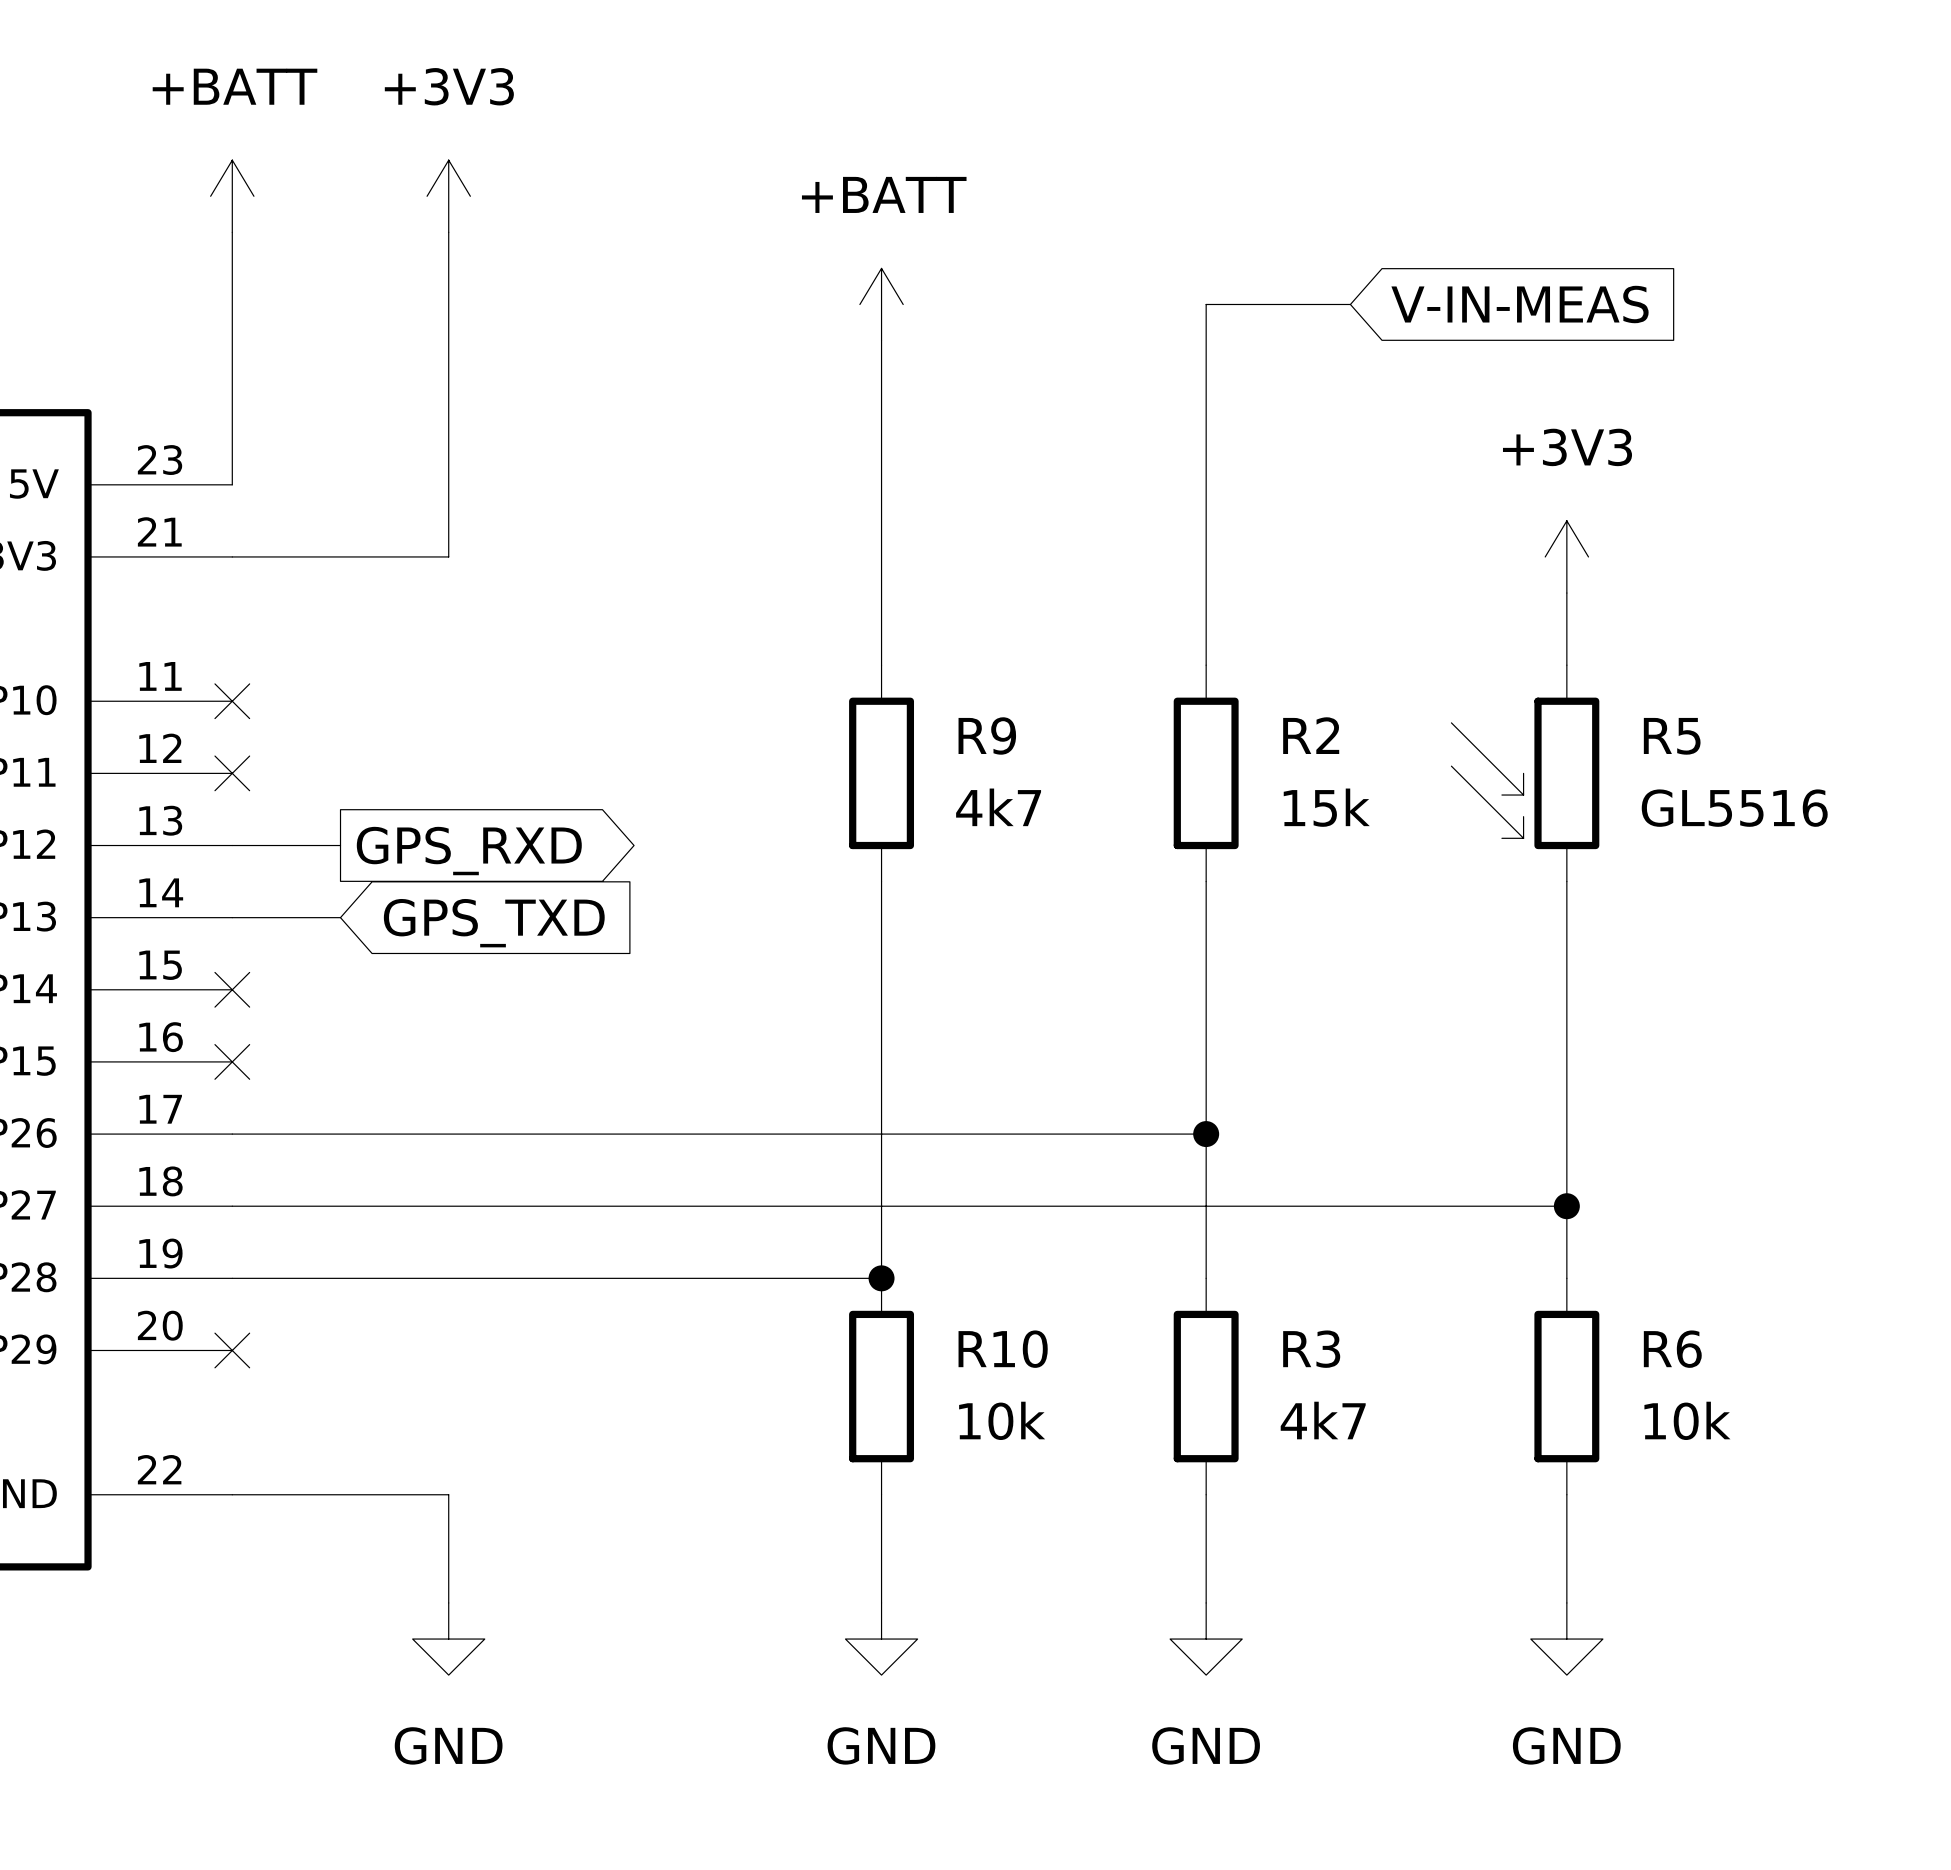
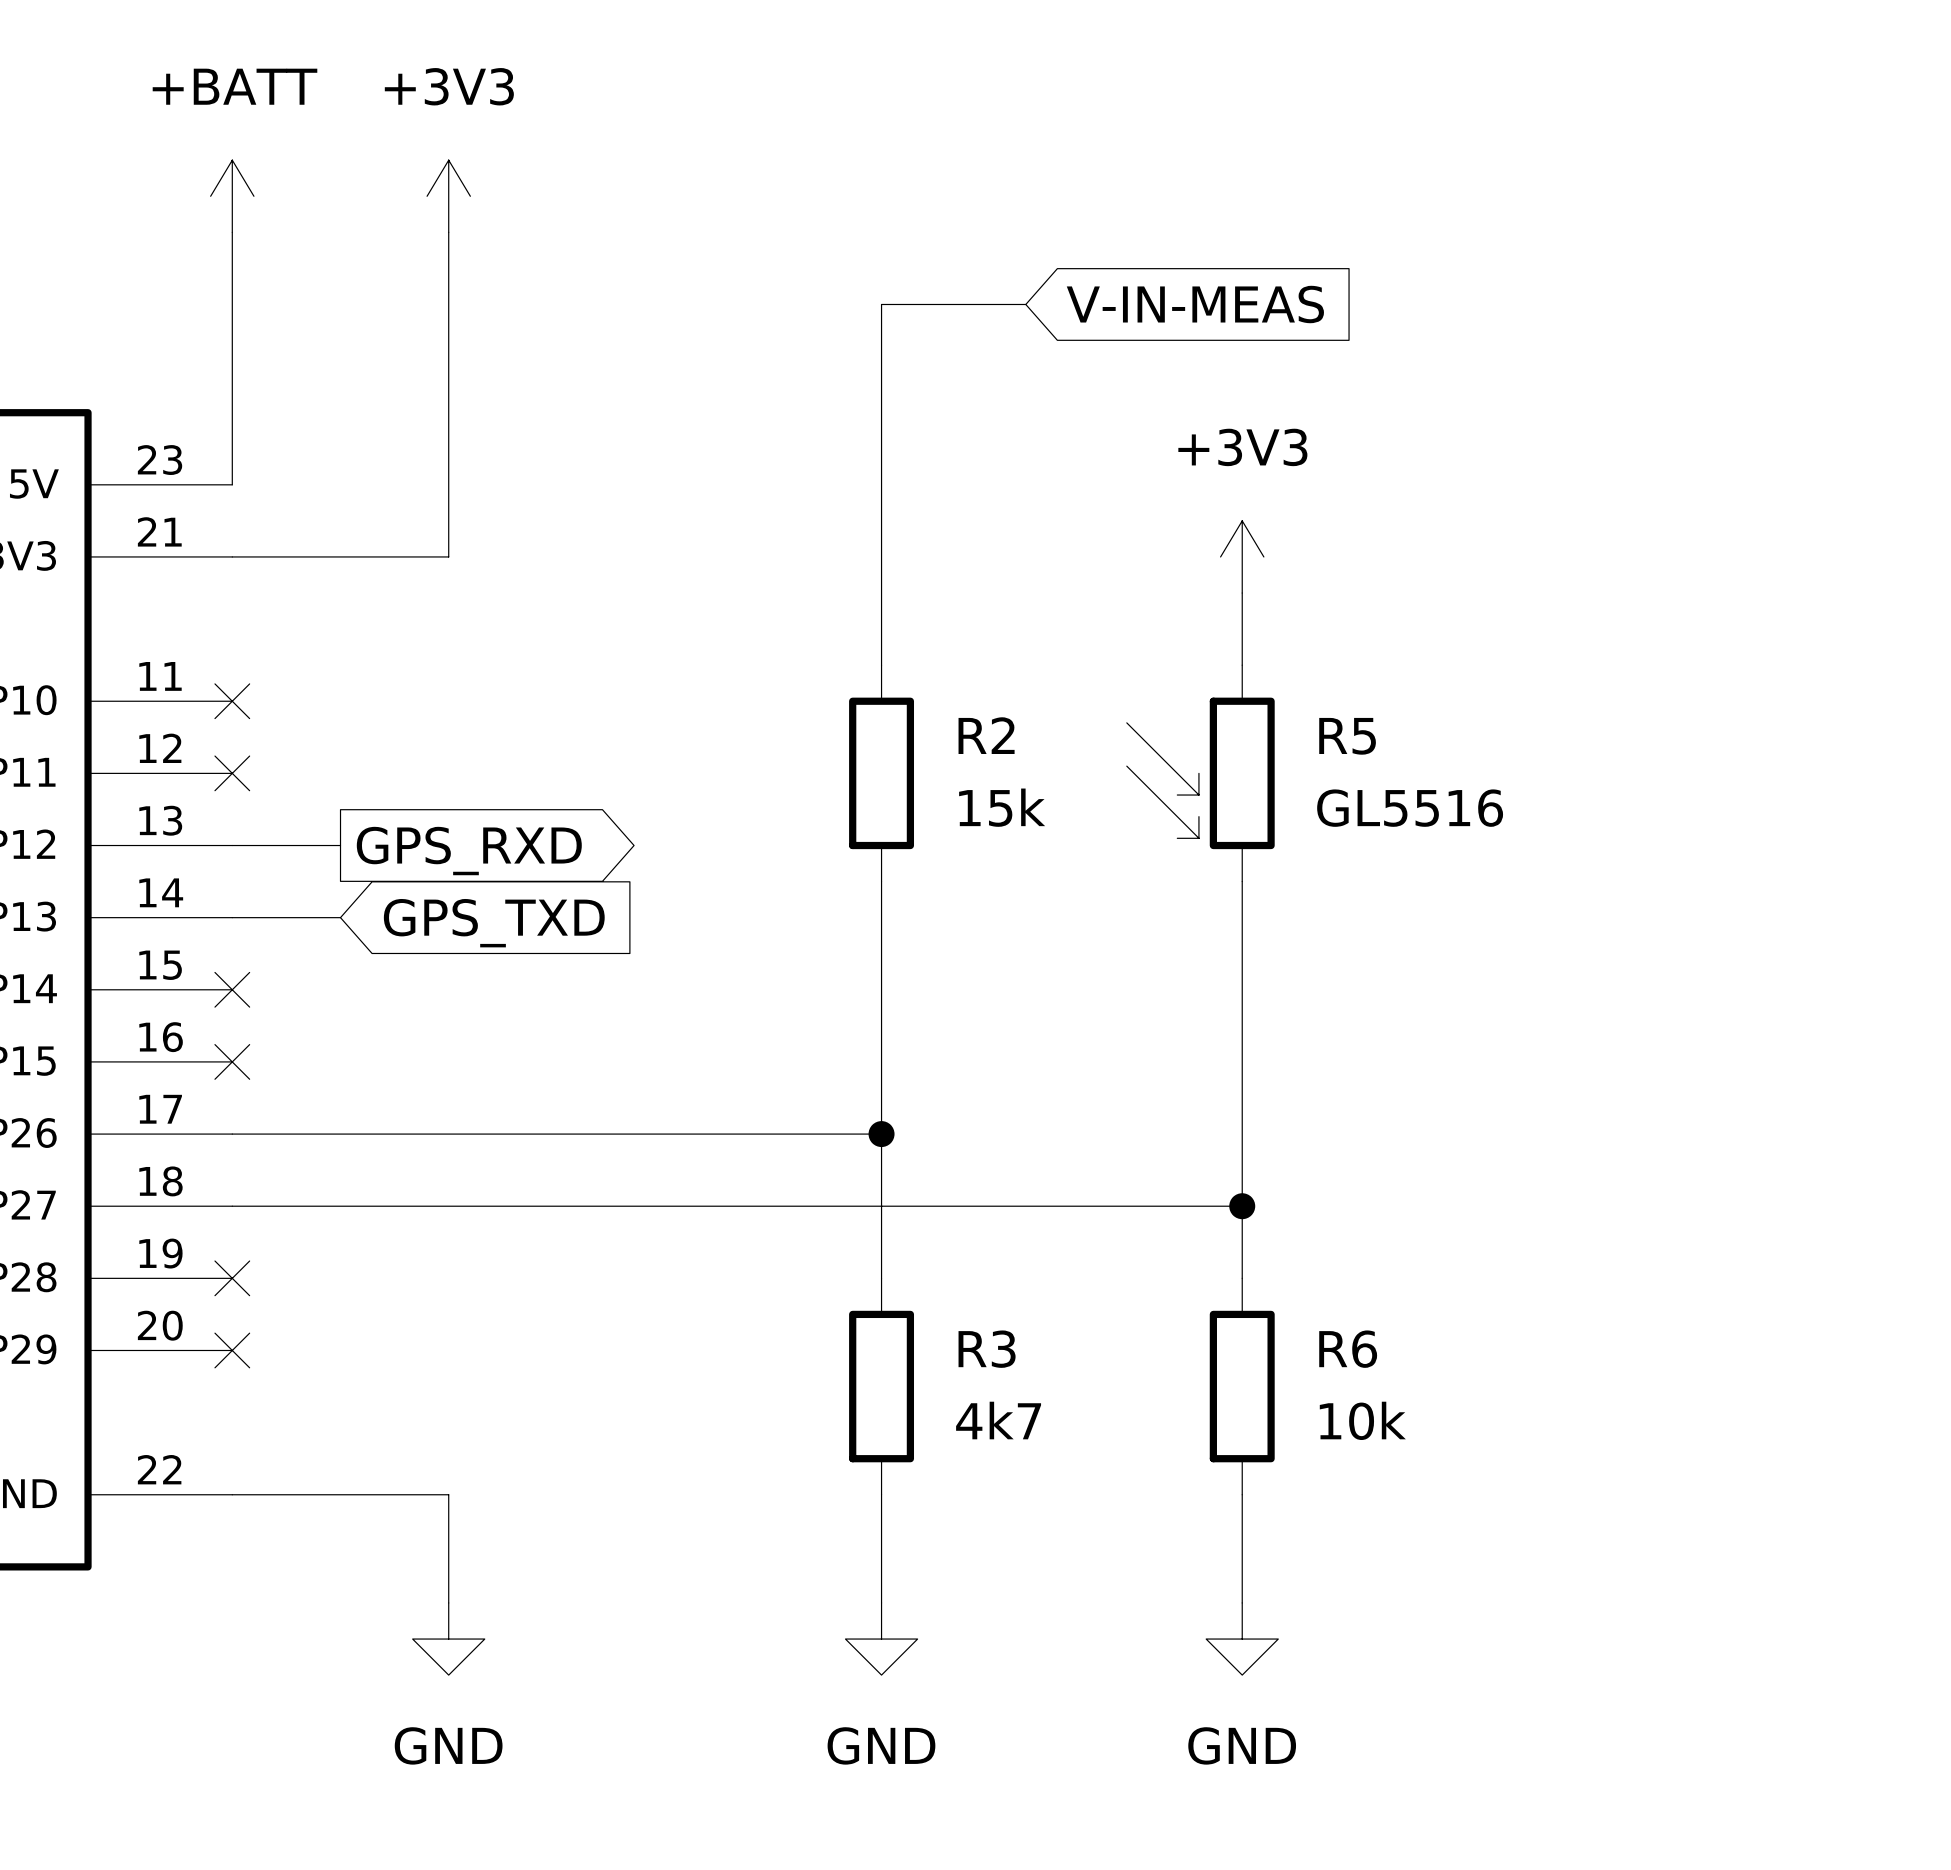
power symbol: +BATT (881, 304) -> none
wire: none -> (1025, 304) (881, 304) (881, 340)
wire: (1350, 304) (1206, 304) (1206, 665) -> none
global label position: V-IN-MEAS (1520, 304) -> V-IN-MEAS (1195, 304)
power symbol position: +3V3 (1566, 556) -> +3V3 (1242, 556)
wire: (1566, 593) (1566, 665) -> (1242, 593) (1242, 665)
R9 name: R9 (987, 735) -> R2 (986, 735)
R2: 15k (1206, 773) -> none
R5 position: (1525, 773) -> (1200, 773)
R9 value: 4k7 (998, 807) -> 15k (1002, 807)
wire: (1206, 881) (1206, 1278) -> none
wire: (1566, 881) (1566, 1278) -> (1242, 881) (1242, 1278)
wire: (881, 1134) (1206, 1134) -> none
junction position: (1206, 1134) -> (1242, 1206)
wire: (1242, 1206) (1566, 1206) -> none
junction: (1566, 1206) -> none
wire: (232, 1278) (881, 1278) -> none
no-connect mark: none -> (232, 1278)
junction position: (881, 1278) -> (881, 1134)
R10 name: R10 (1003, 1349) -> R3 (987, 1349)
R3: 4k7 (1206, 1386) -> none
R6 position: (1566, 1386) -> (1242, 1386)
R10 value: 10k (1002, 1420) -> 4k7 (998, 1420)
wire: (1206, 1494) (1206, 1602) -> none
wire: (1566, 1494) (1566, 1602) -> (1242, 1494) (1242, 1602)
power symbol position: GND (1206, 1639) -> GND (1242, 1639)
power symbol: GND (1566, 1639) -> none

